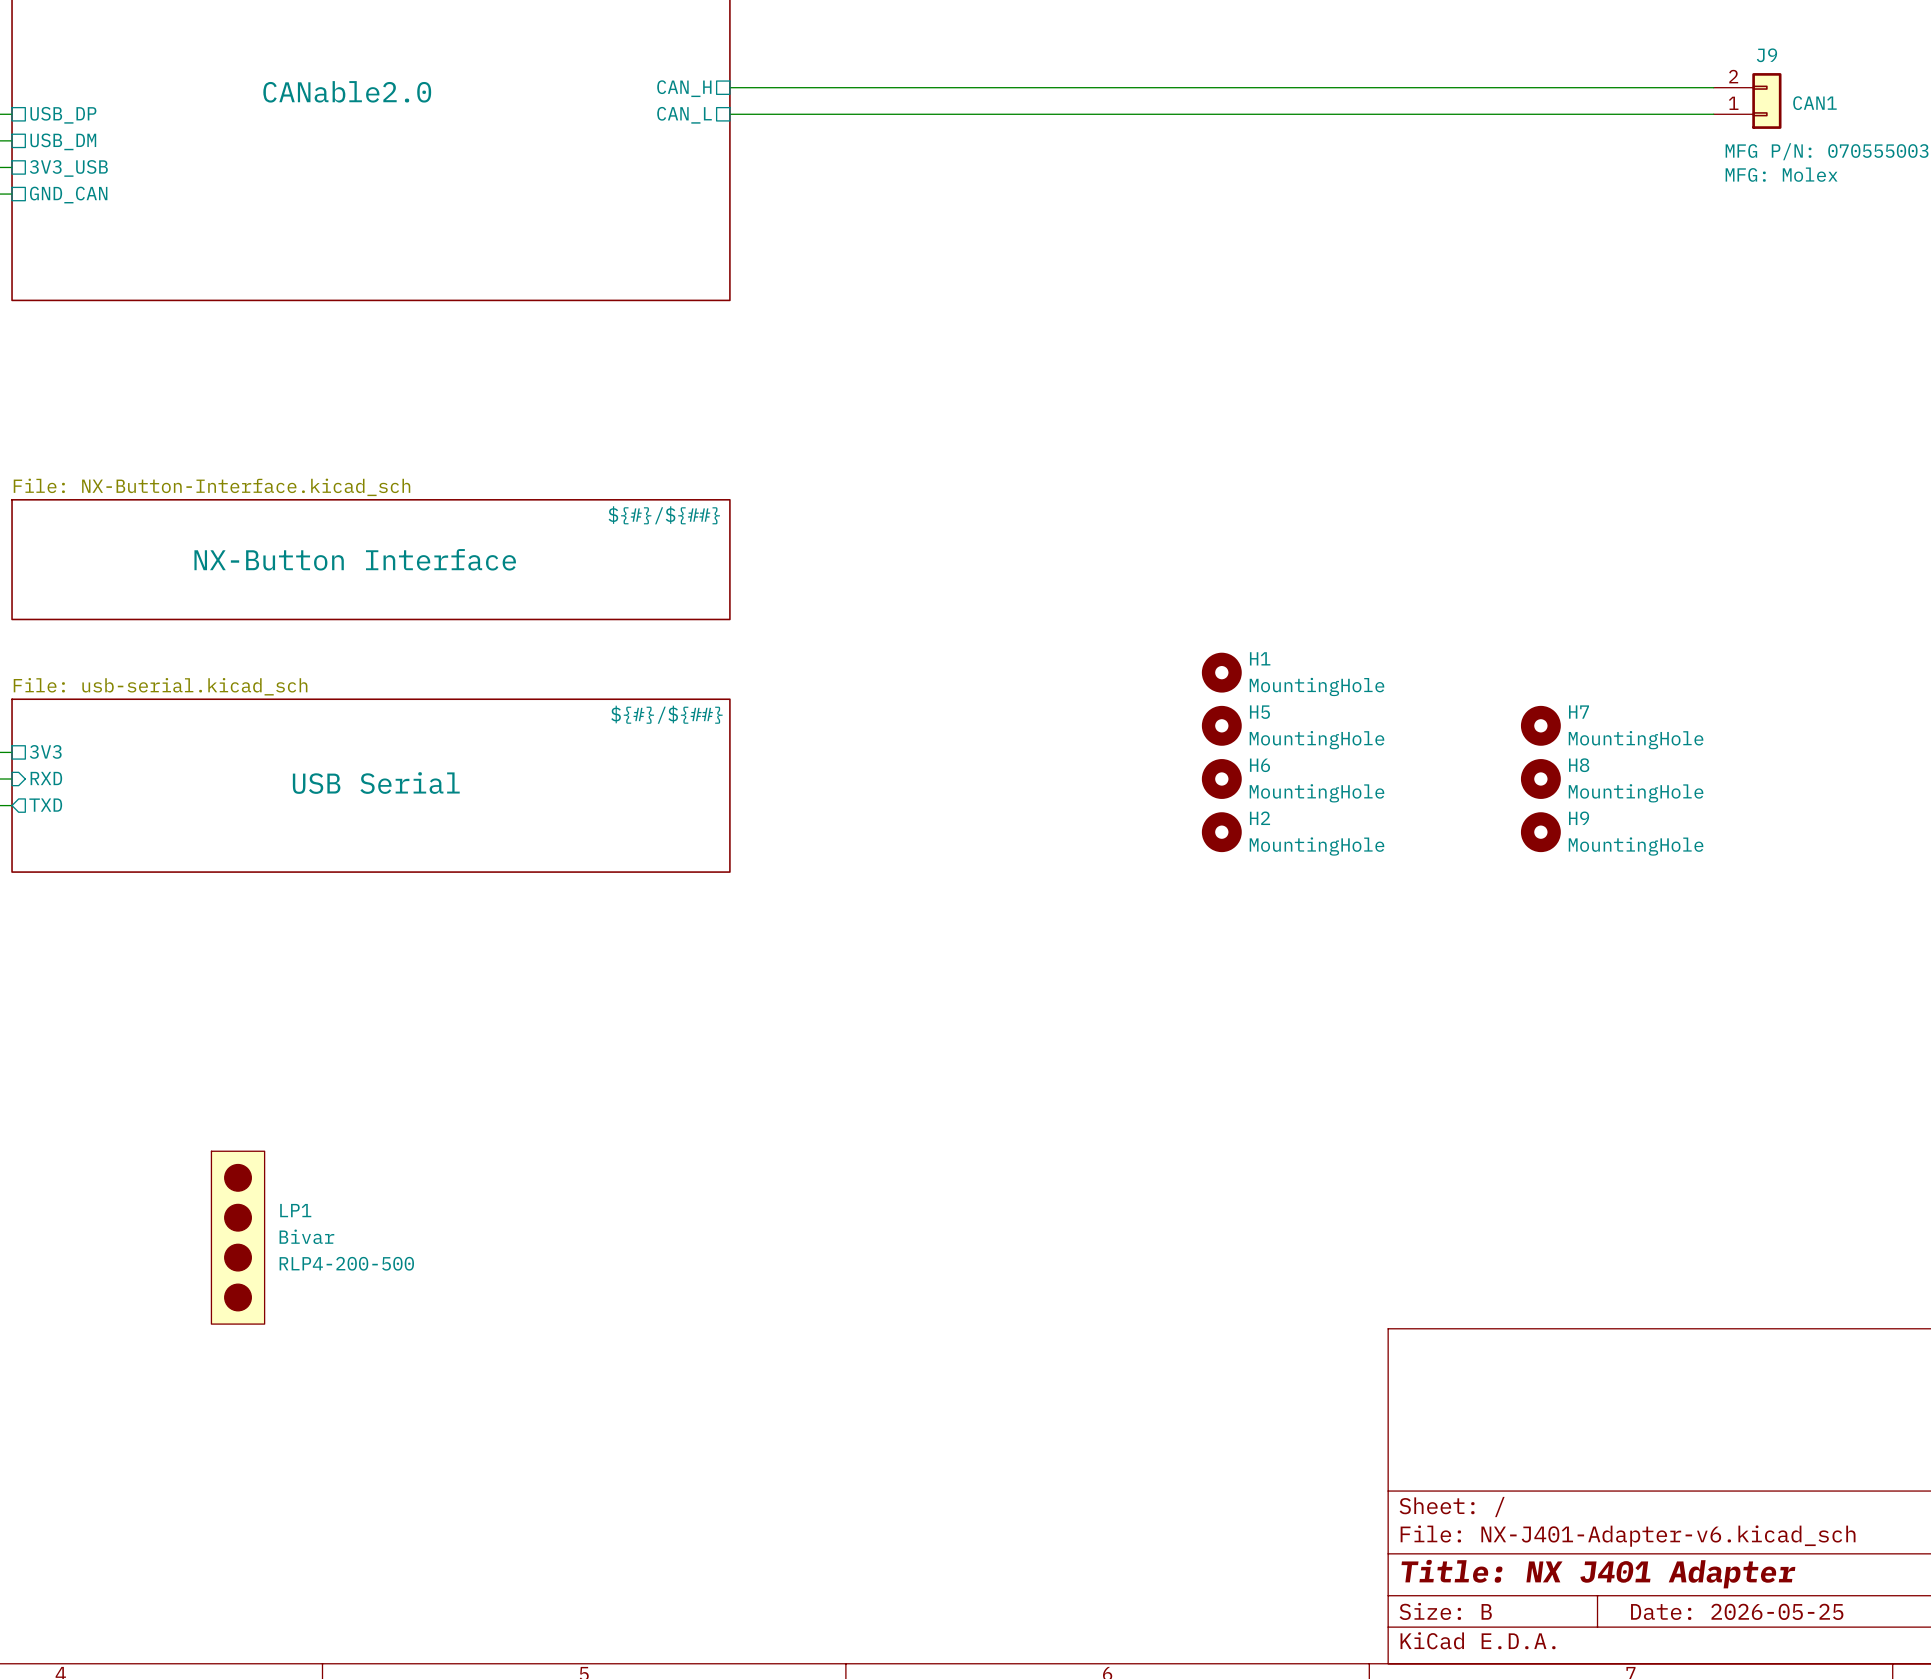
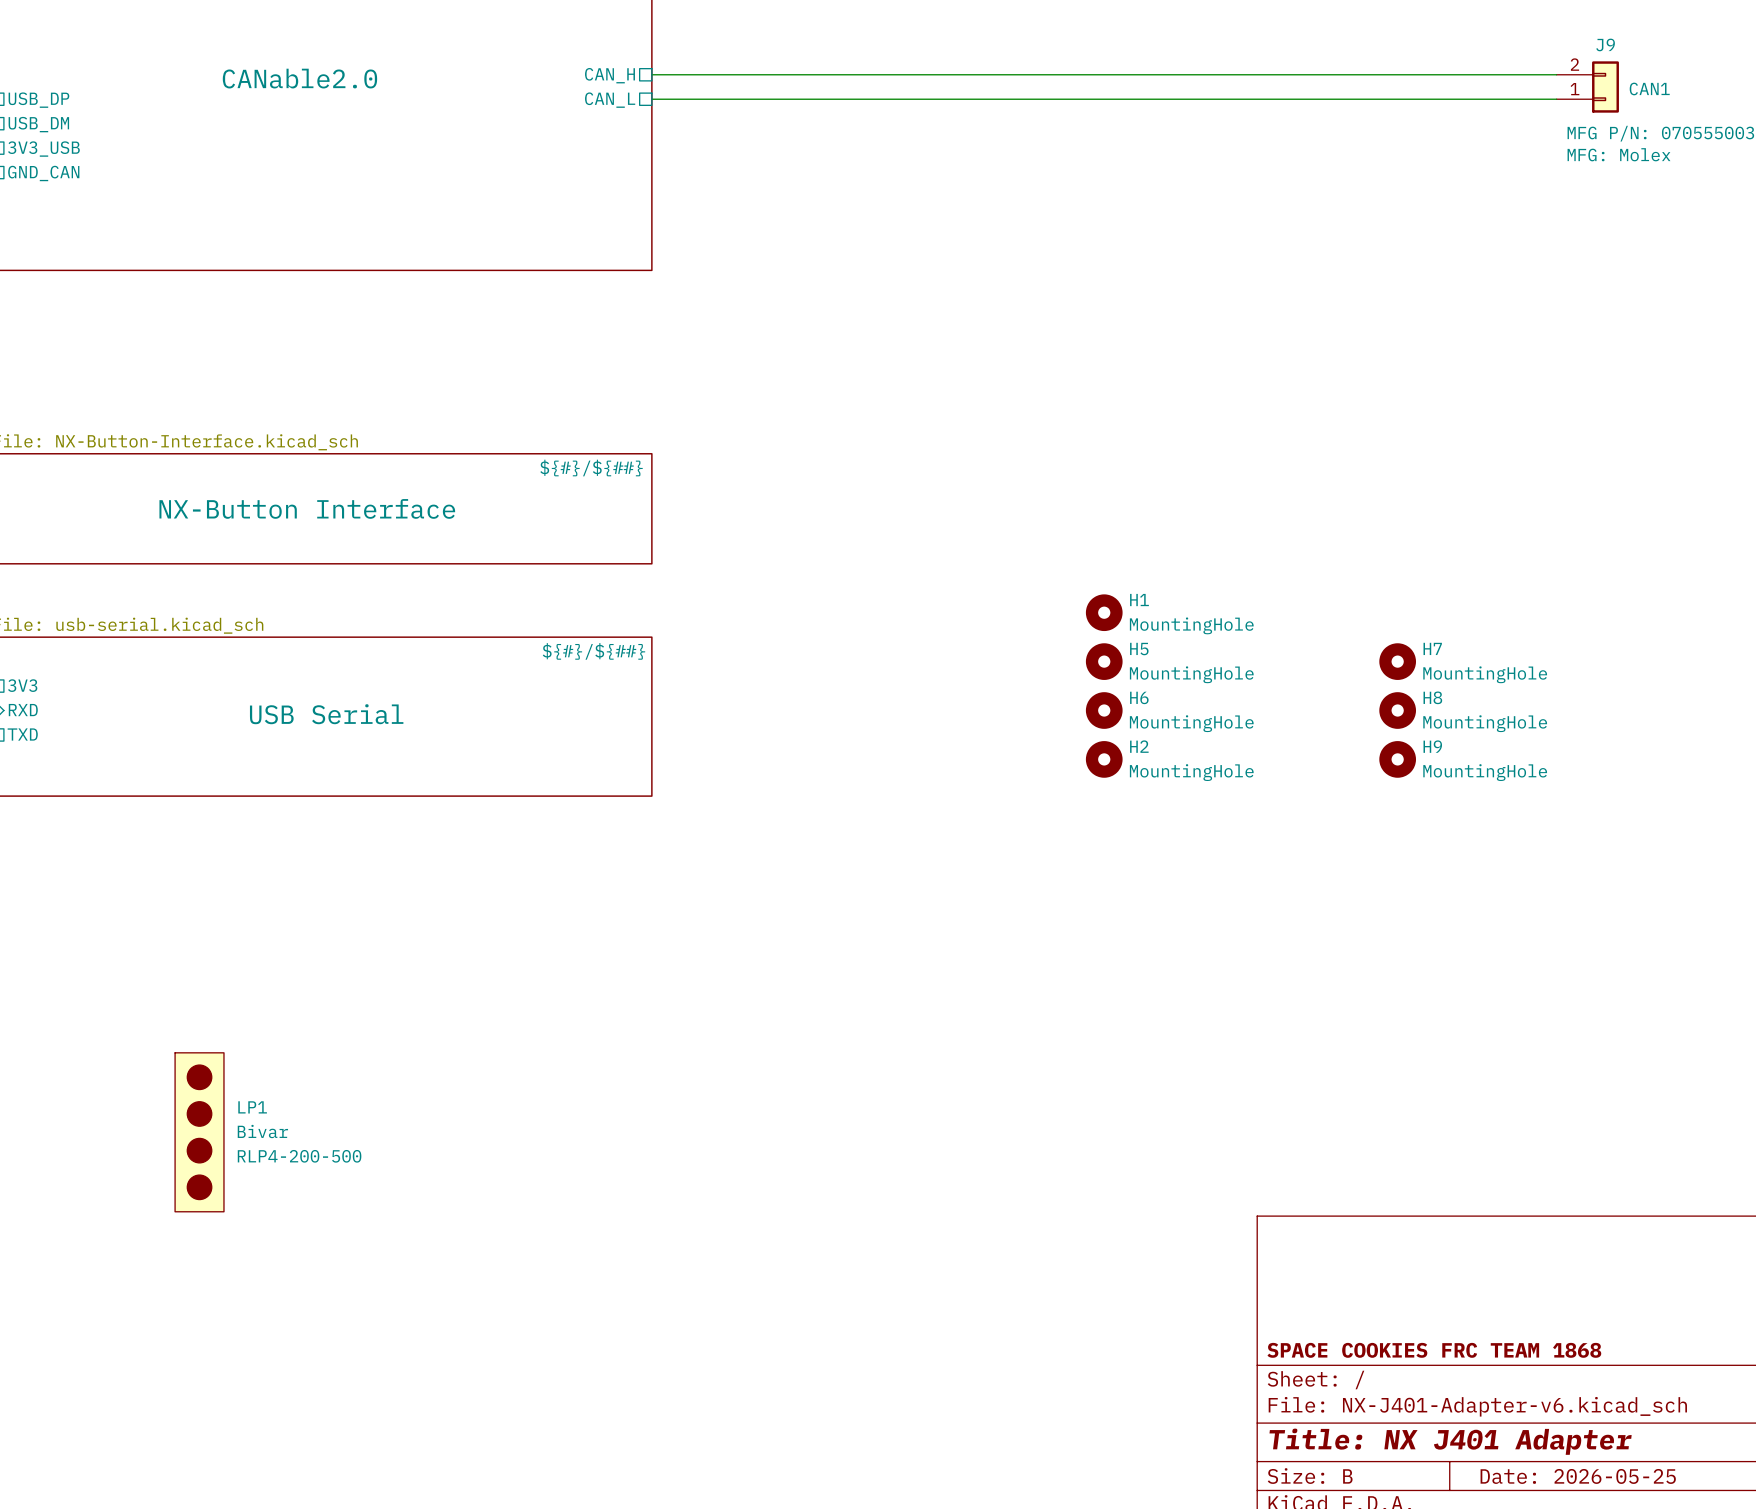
title block: none -> SPACE COOKIES FRC TEAM 1868 (1434, 1350)

